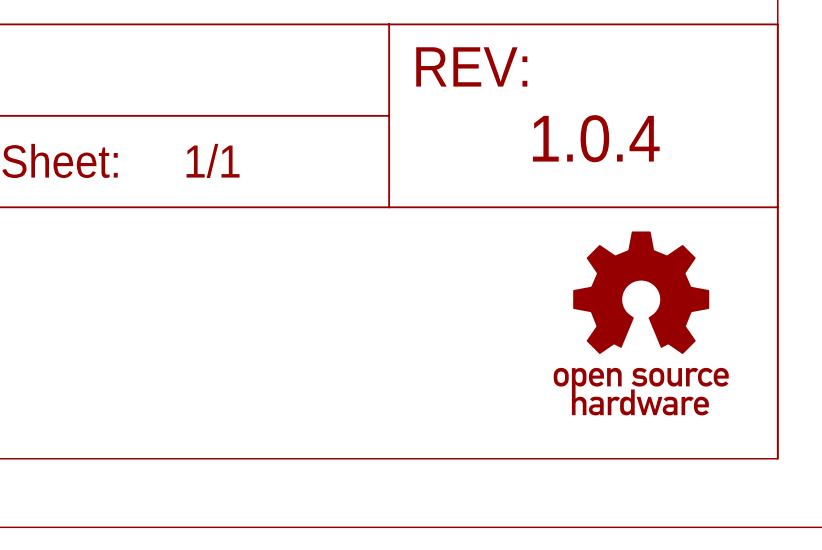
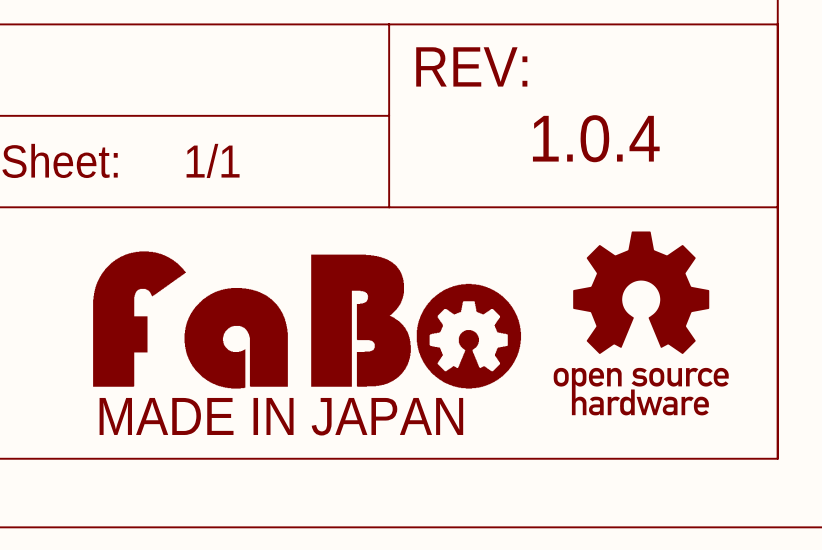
part: none -> (307, 319)

